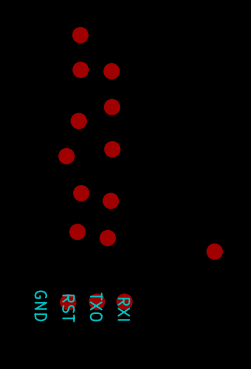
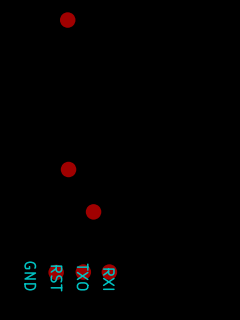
part: (80, 69) -> none
part: (111, 71) -> none
part: (112, 107) -> none
part: (78, 120) -> none
part: (112, 149) -> none
part: (66, 156) -> none
part: (110, 200) -> none
part: (77, 231) -> none
part: (214, 251) -> none

